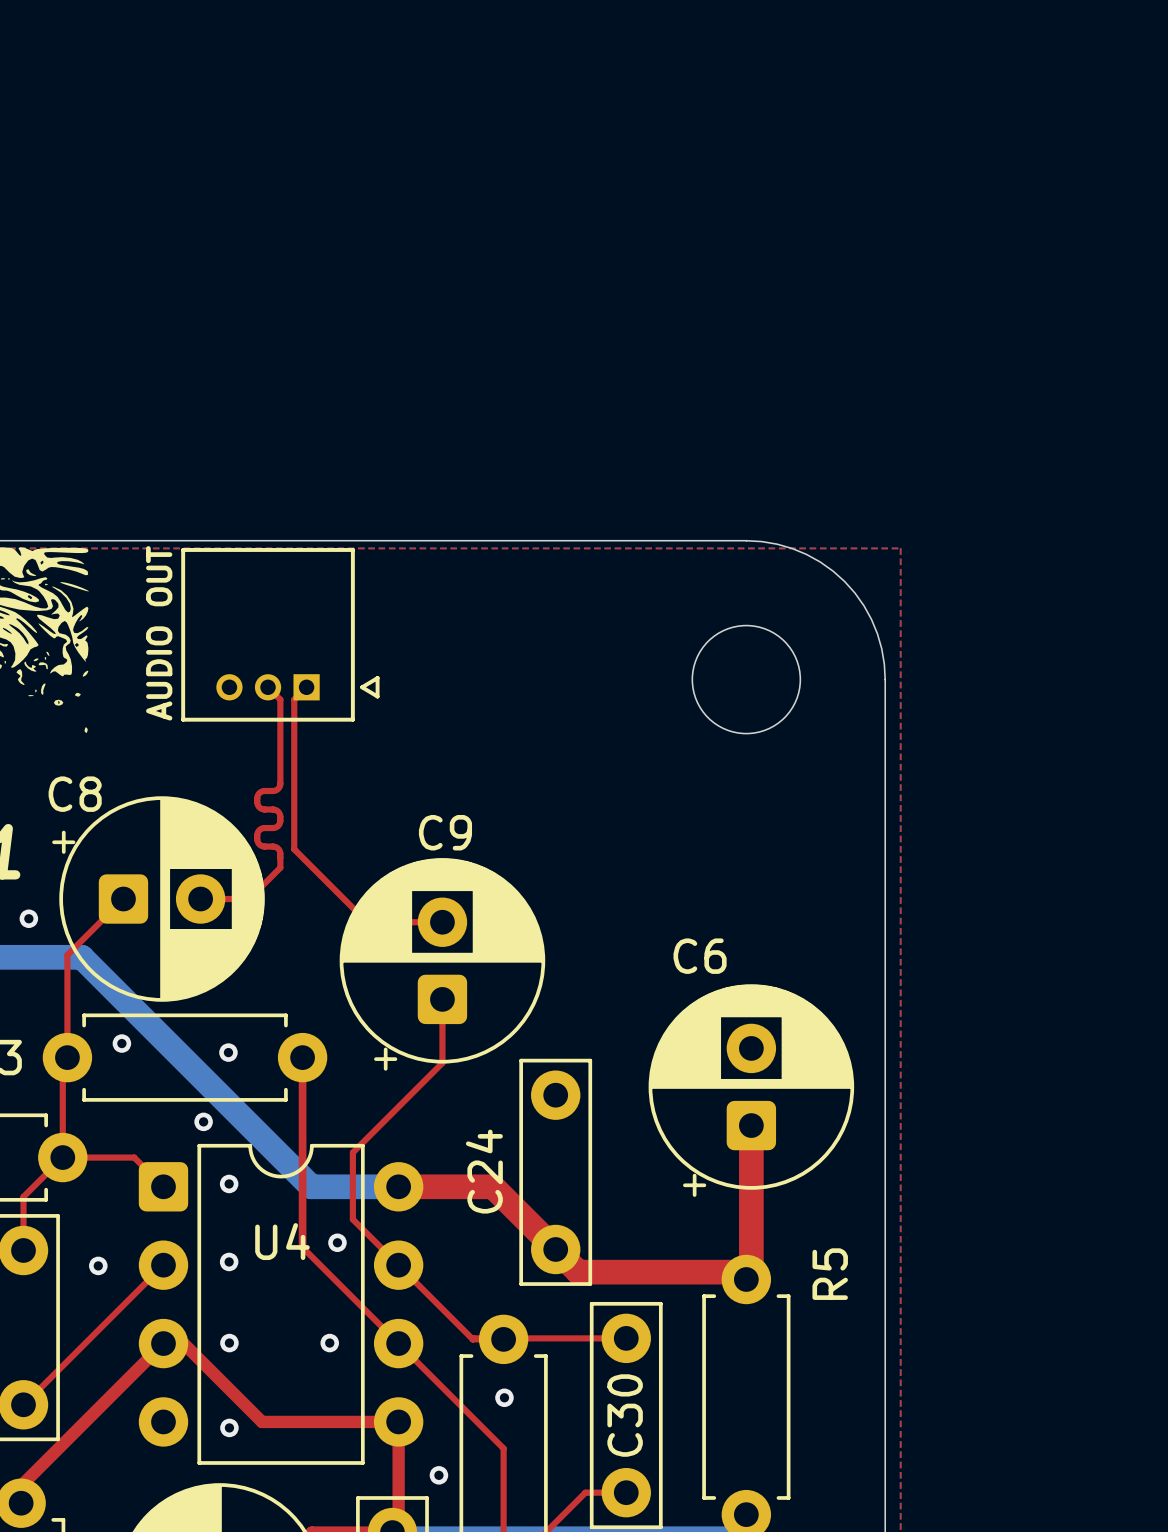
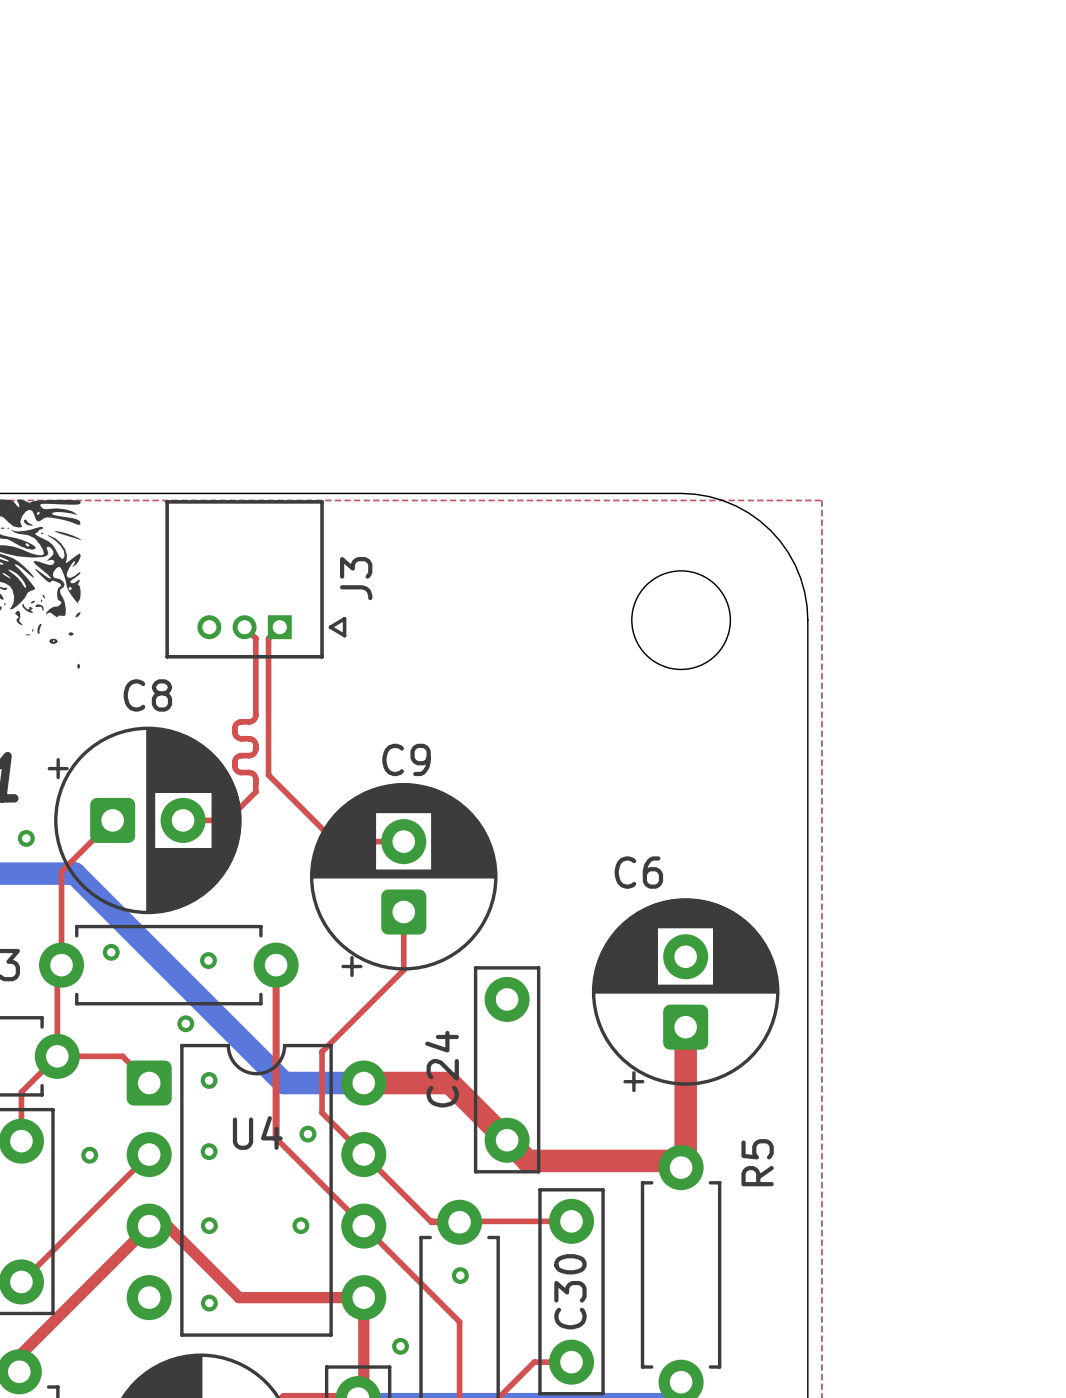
AUDIO OUT name: AUDIO OUT (159, 633) -> J3 (356, 578)
C8 name position: C8 (75, 794) -> C8 (147, 695)

